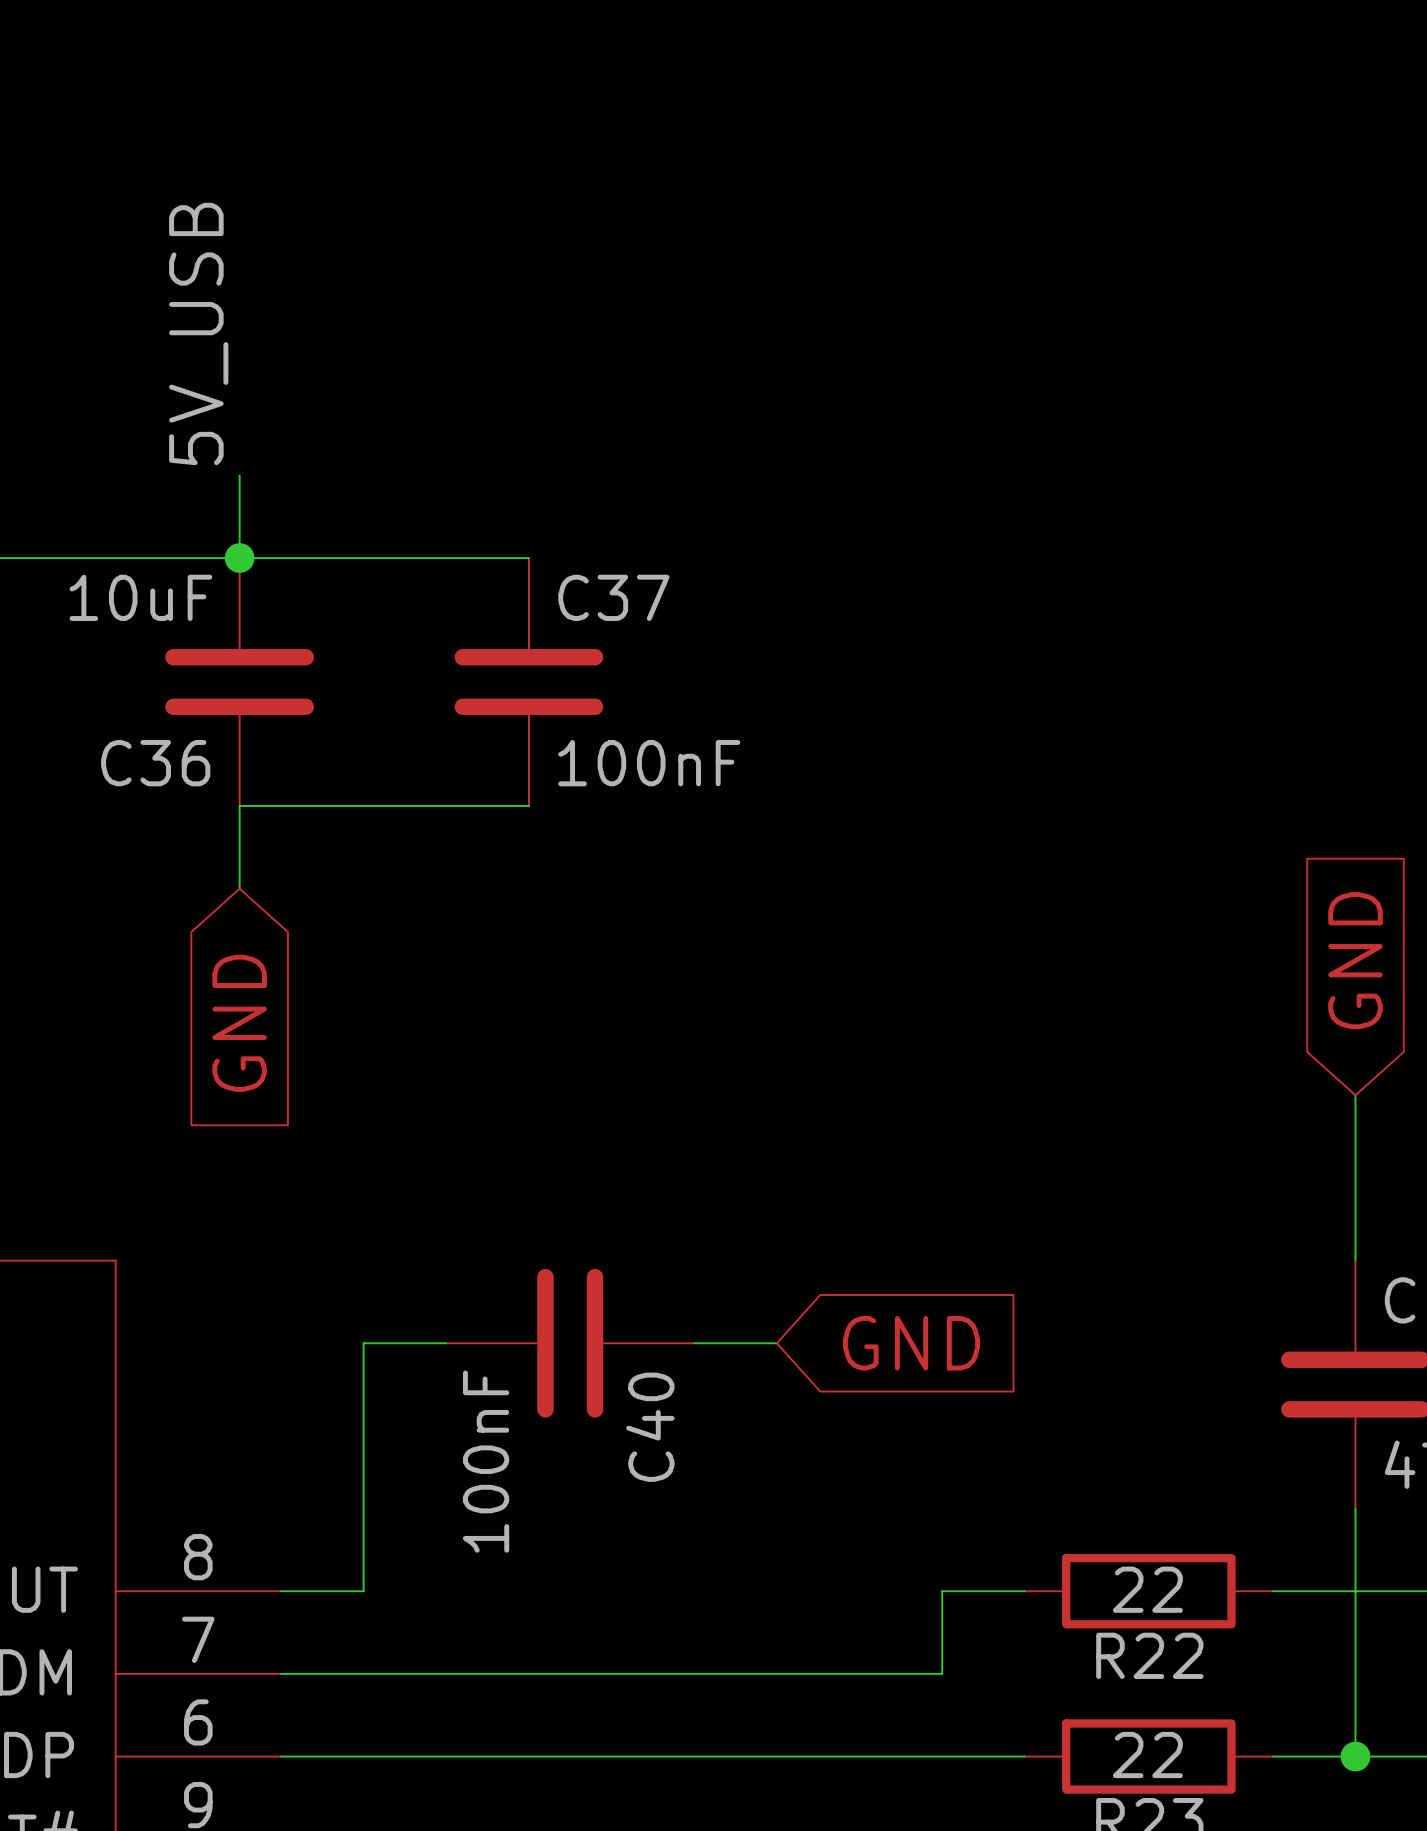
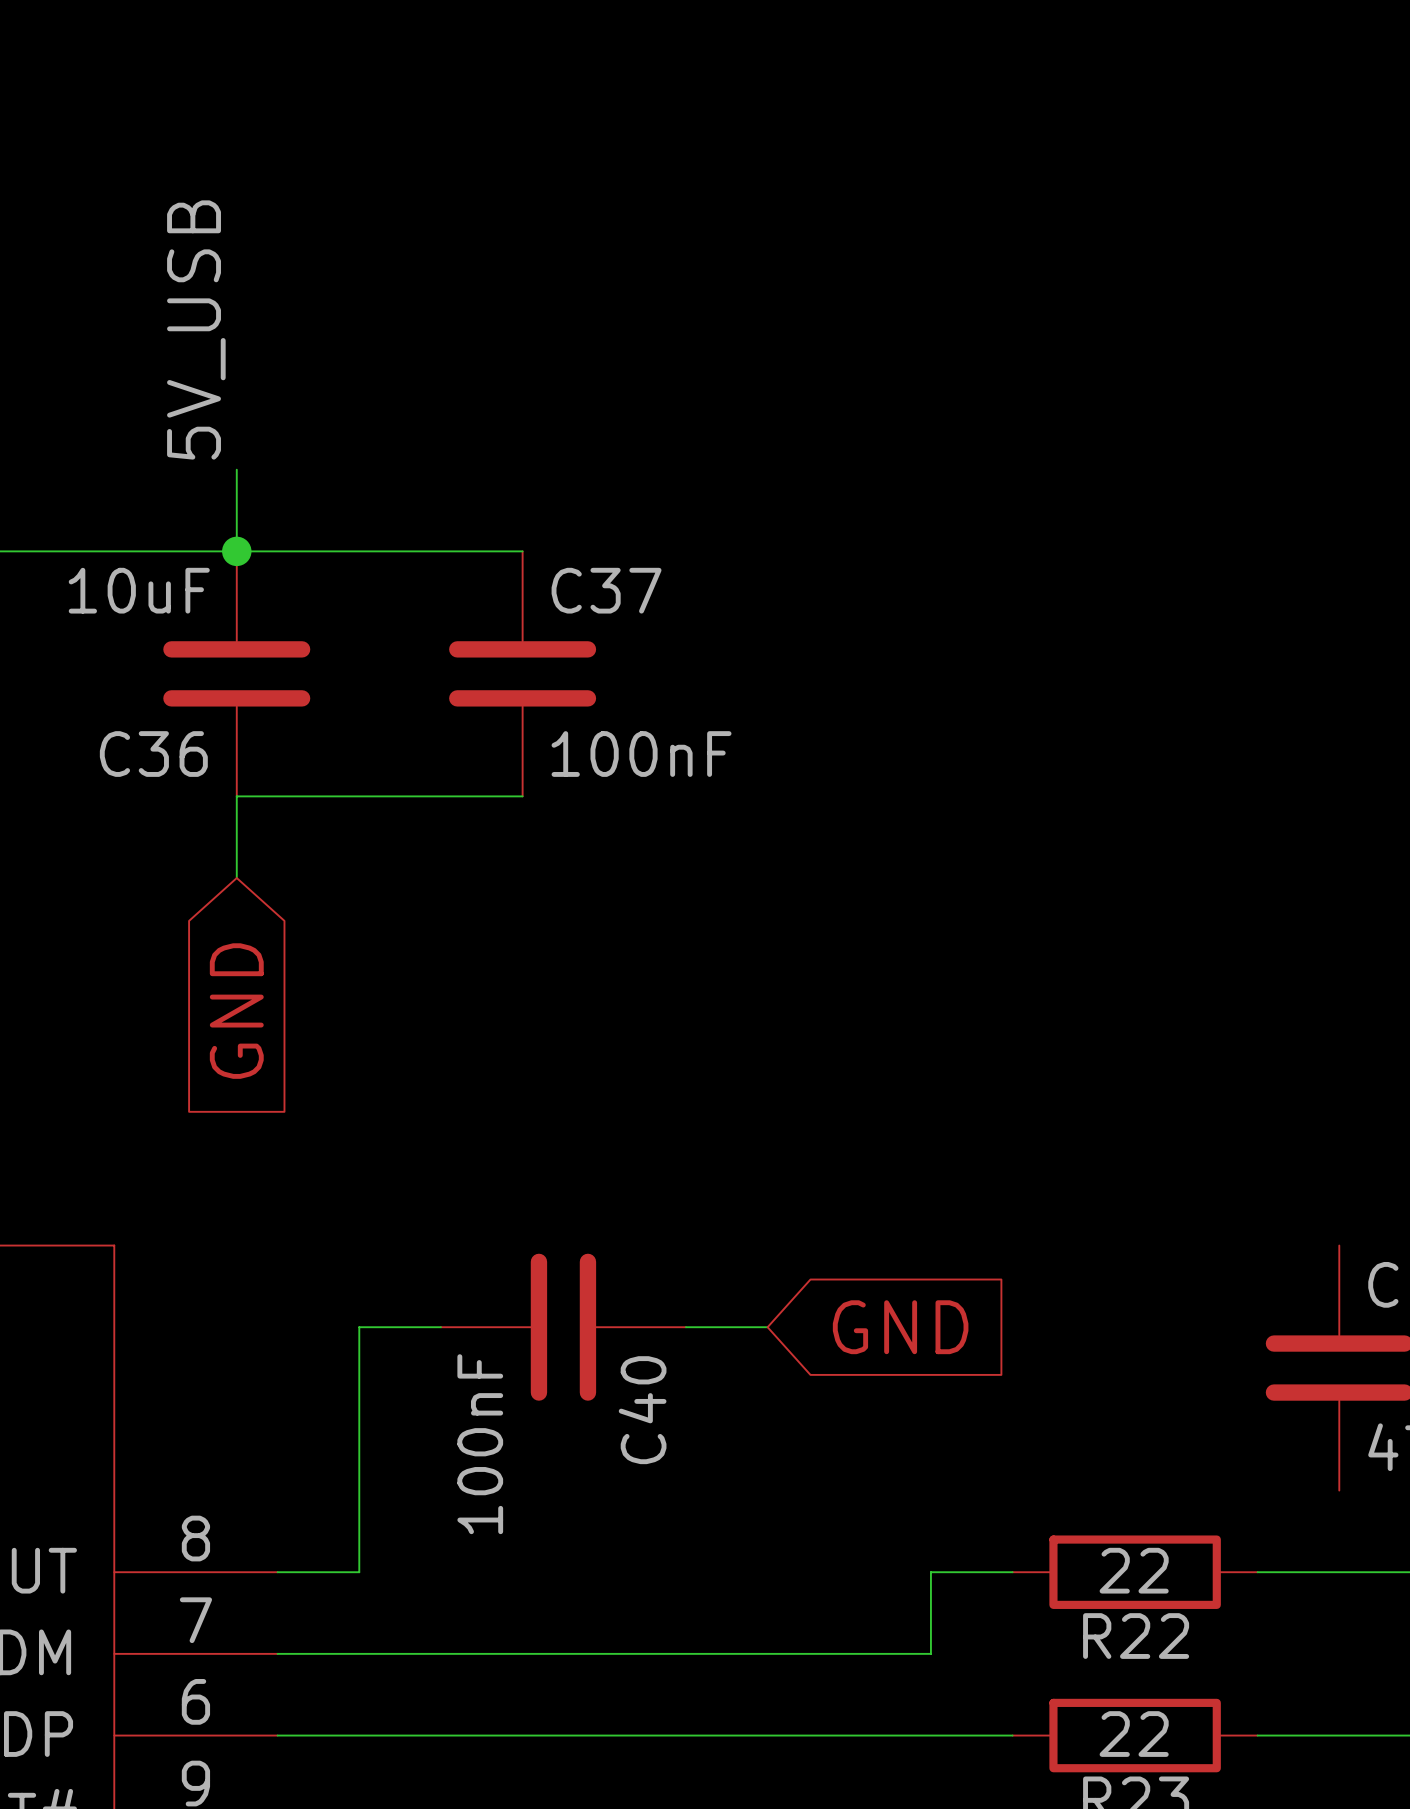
global label: GND (1355, 960) -> none
wire: (1355, 1095) (1355, 1260) -> none
wire: (1355, 1508) (1355, 1756) -> none
junction: (1355, 1756) -> none

